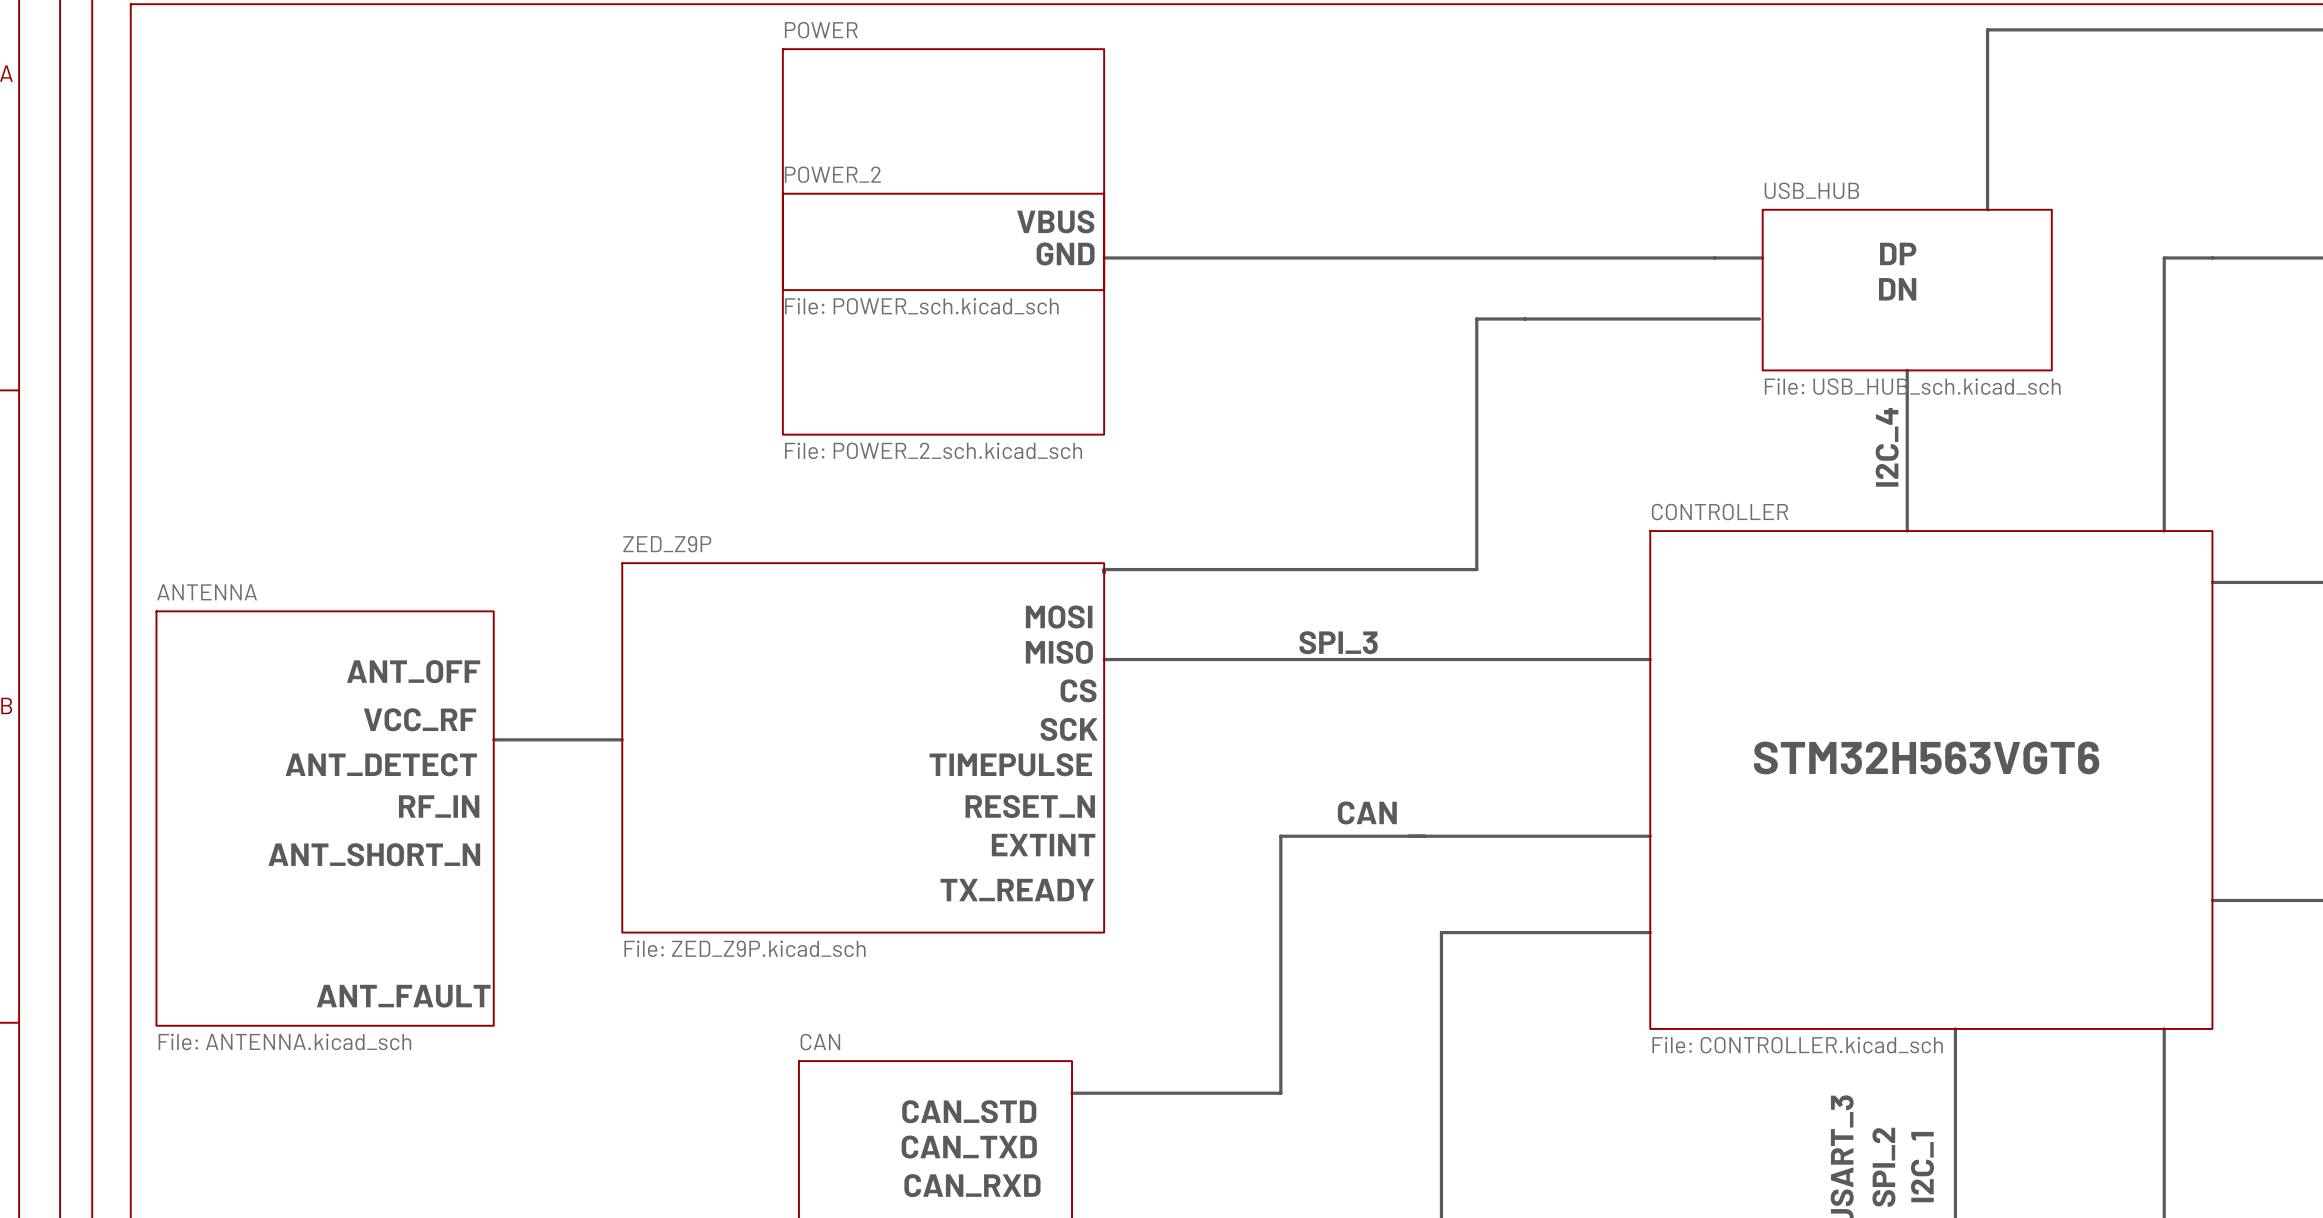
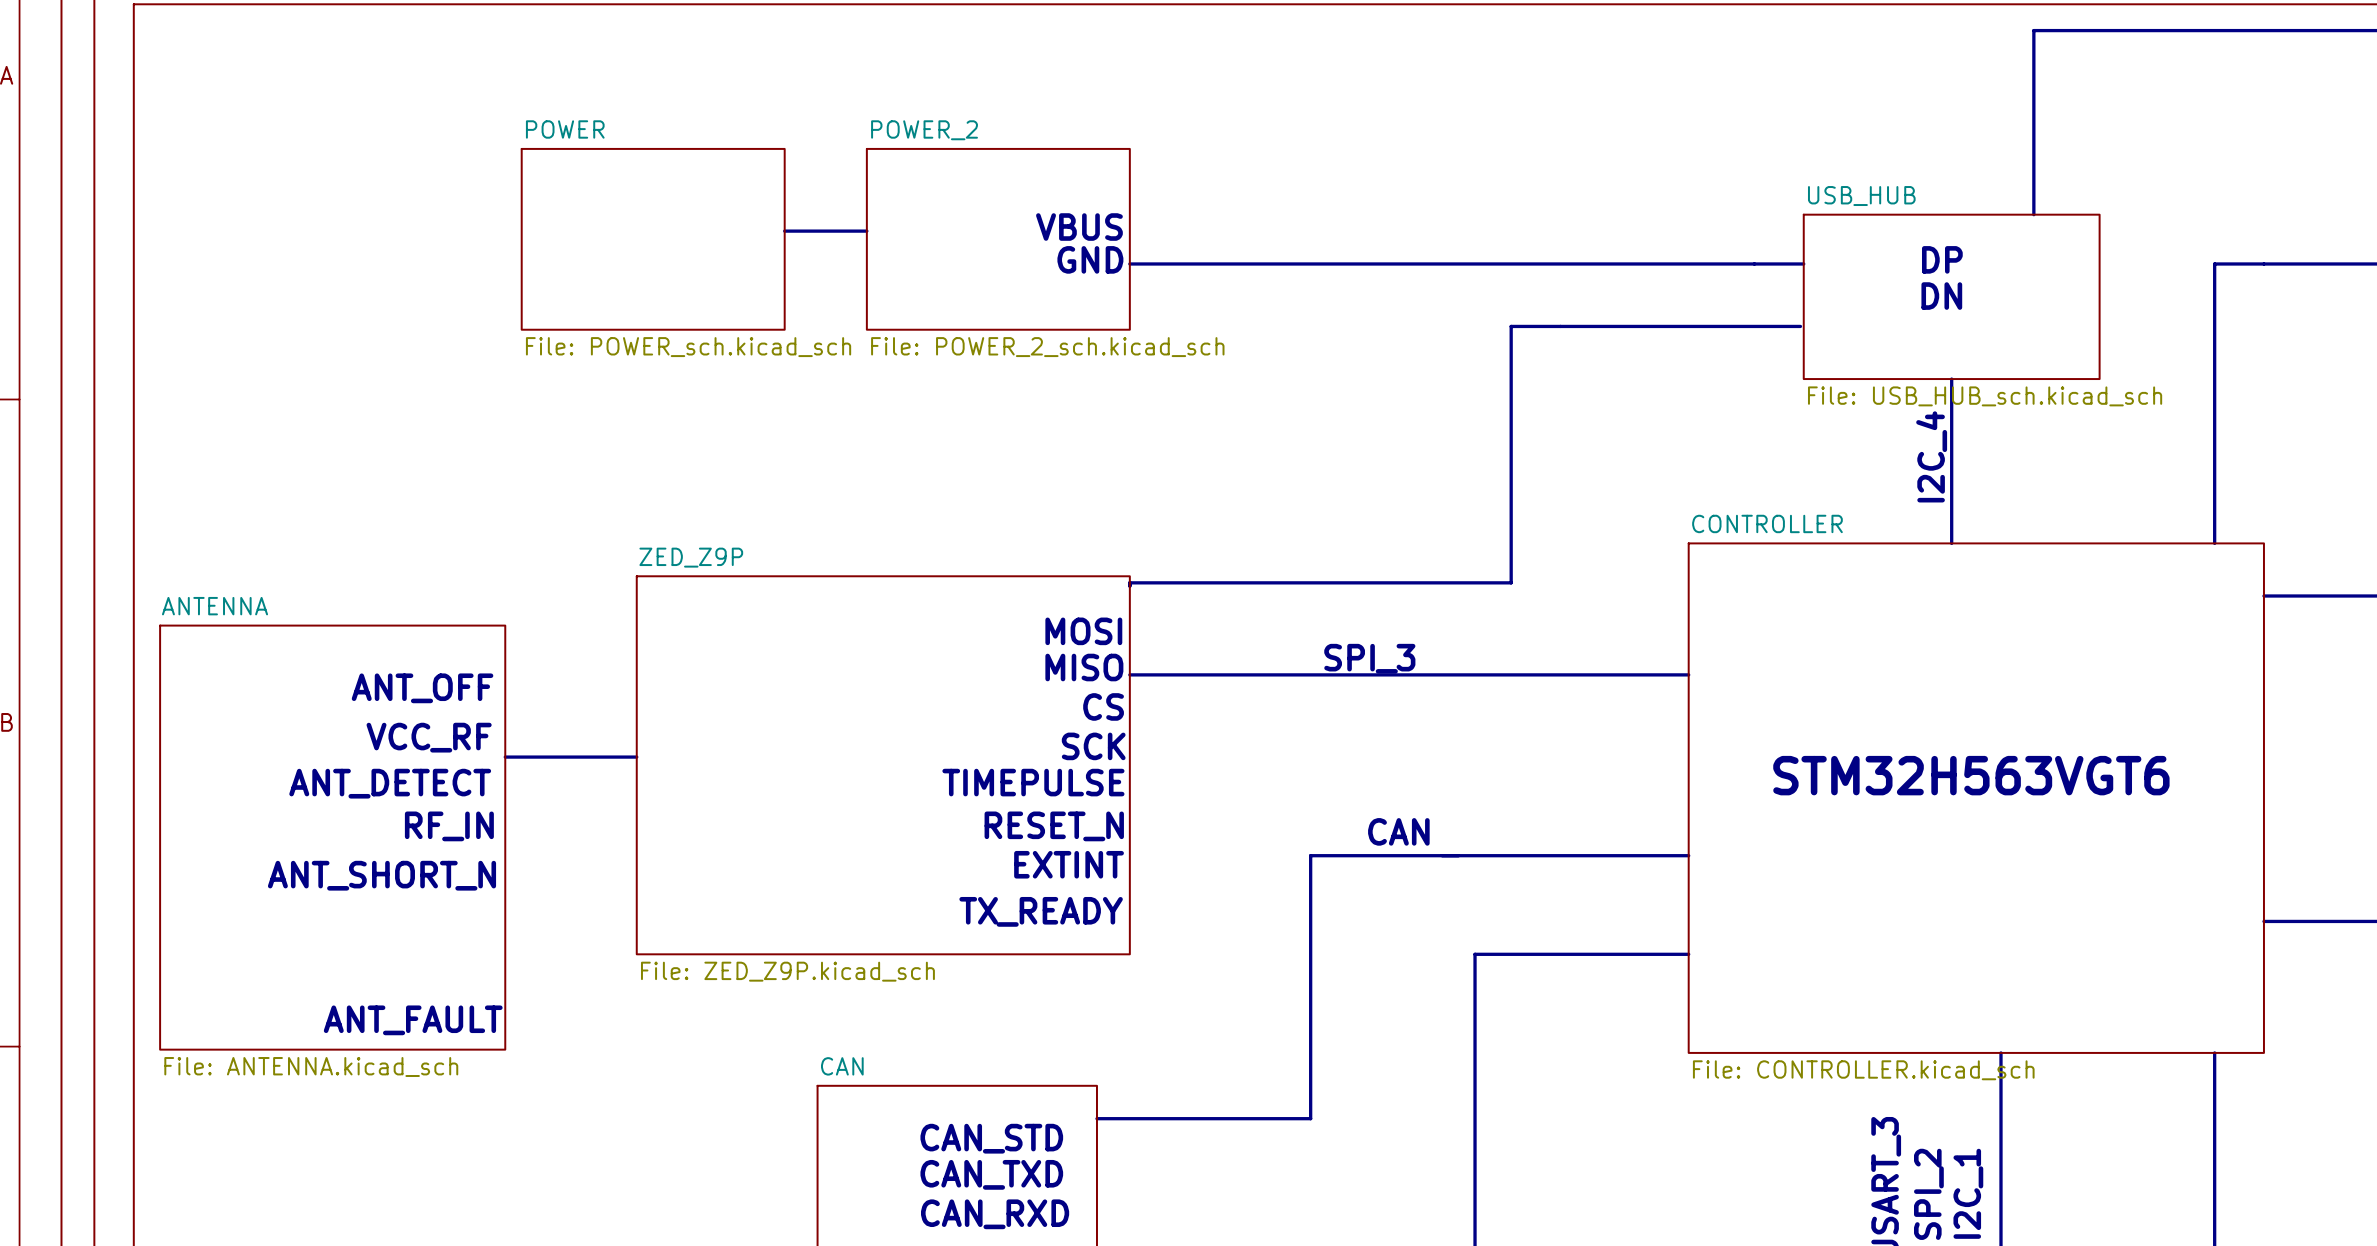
sheet POWER: File: POWER_sch.kicad_sch (943, 169) -> none
sheet POWER_2 name position: POWER_2 (832, 174) -> POWER_2 (924, 130)
sheet POWER_2 shape: [781, 192, 1106, 436] -> [865, 147, 1131, 331]
line: none -> (784, 231) (866, 231)
sheet POWER: none -> File: POWER_sch.kicad_sch (653, 239)
sheet POWER_2 value position: File: POWER_2_sch.kicad_sch (933, 450) -> File: POWER_2_sch.kicad_sch (1047, 347)

